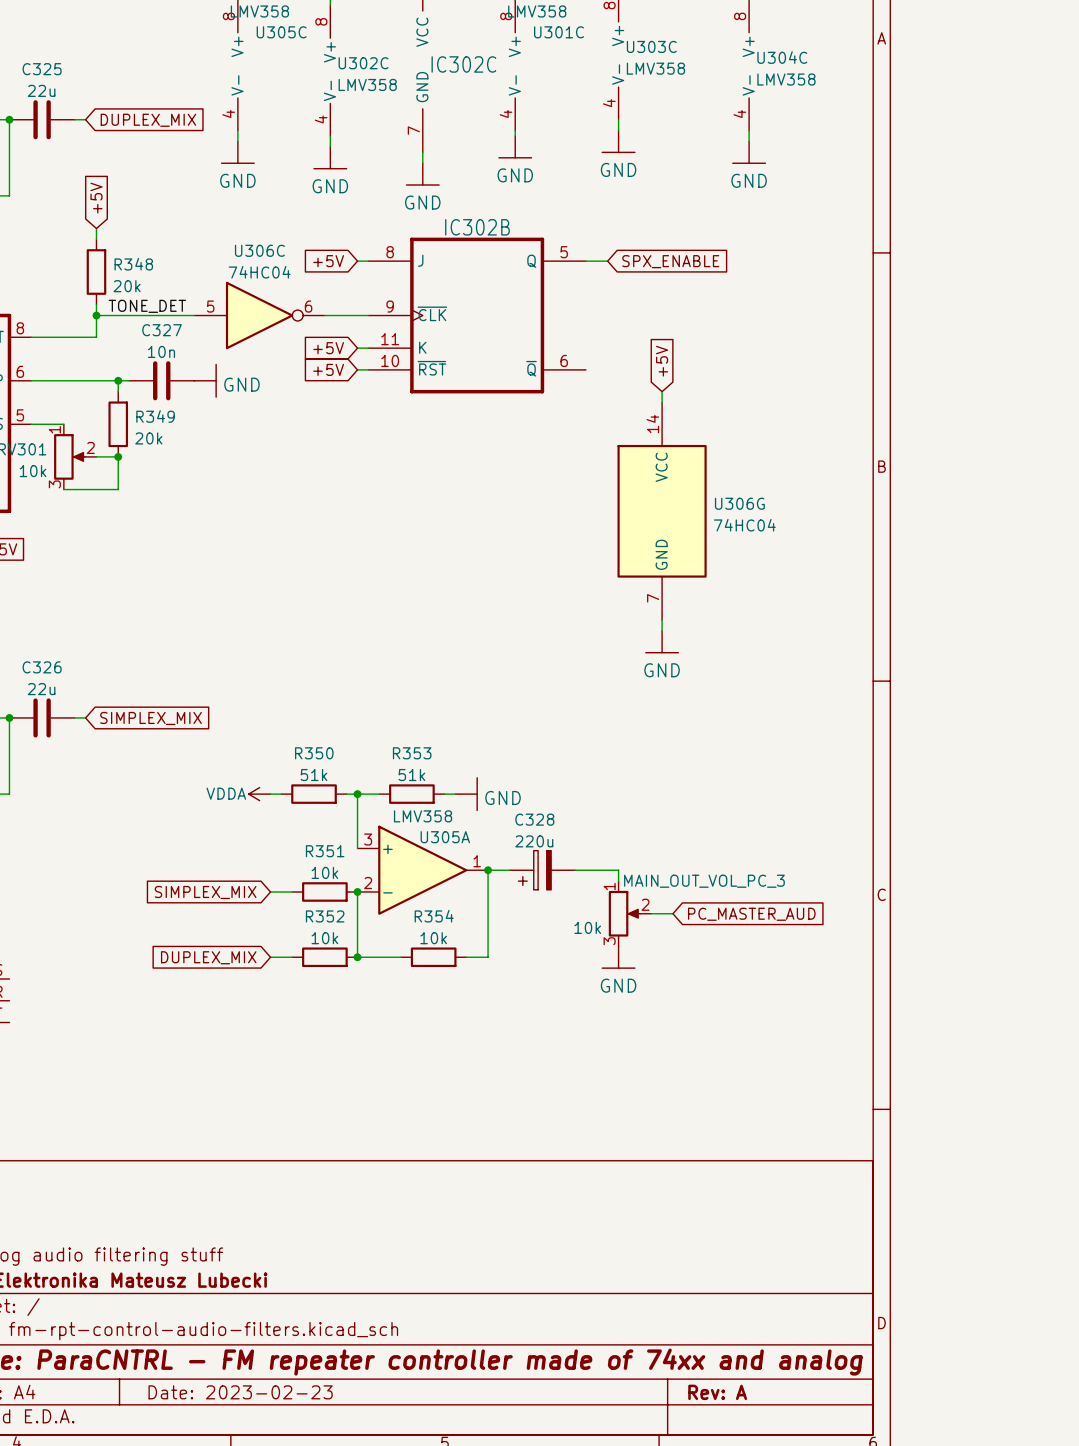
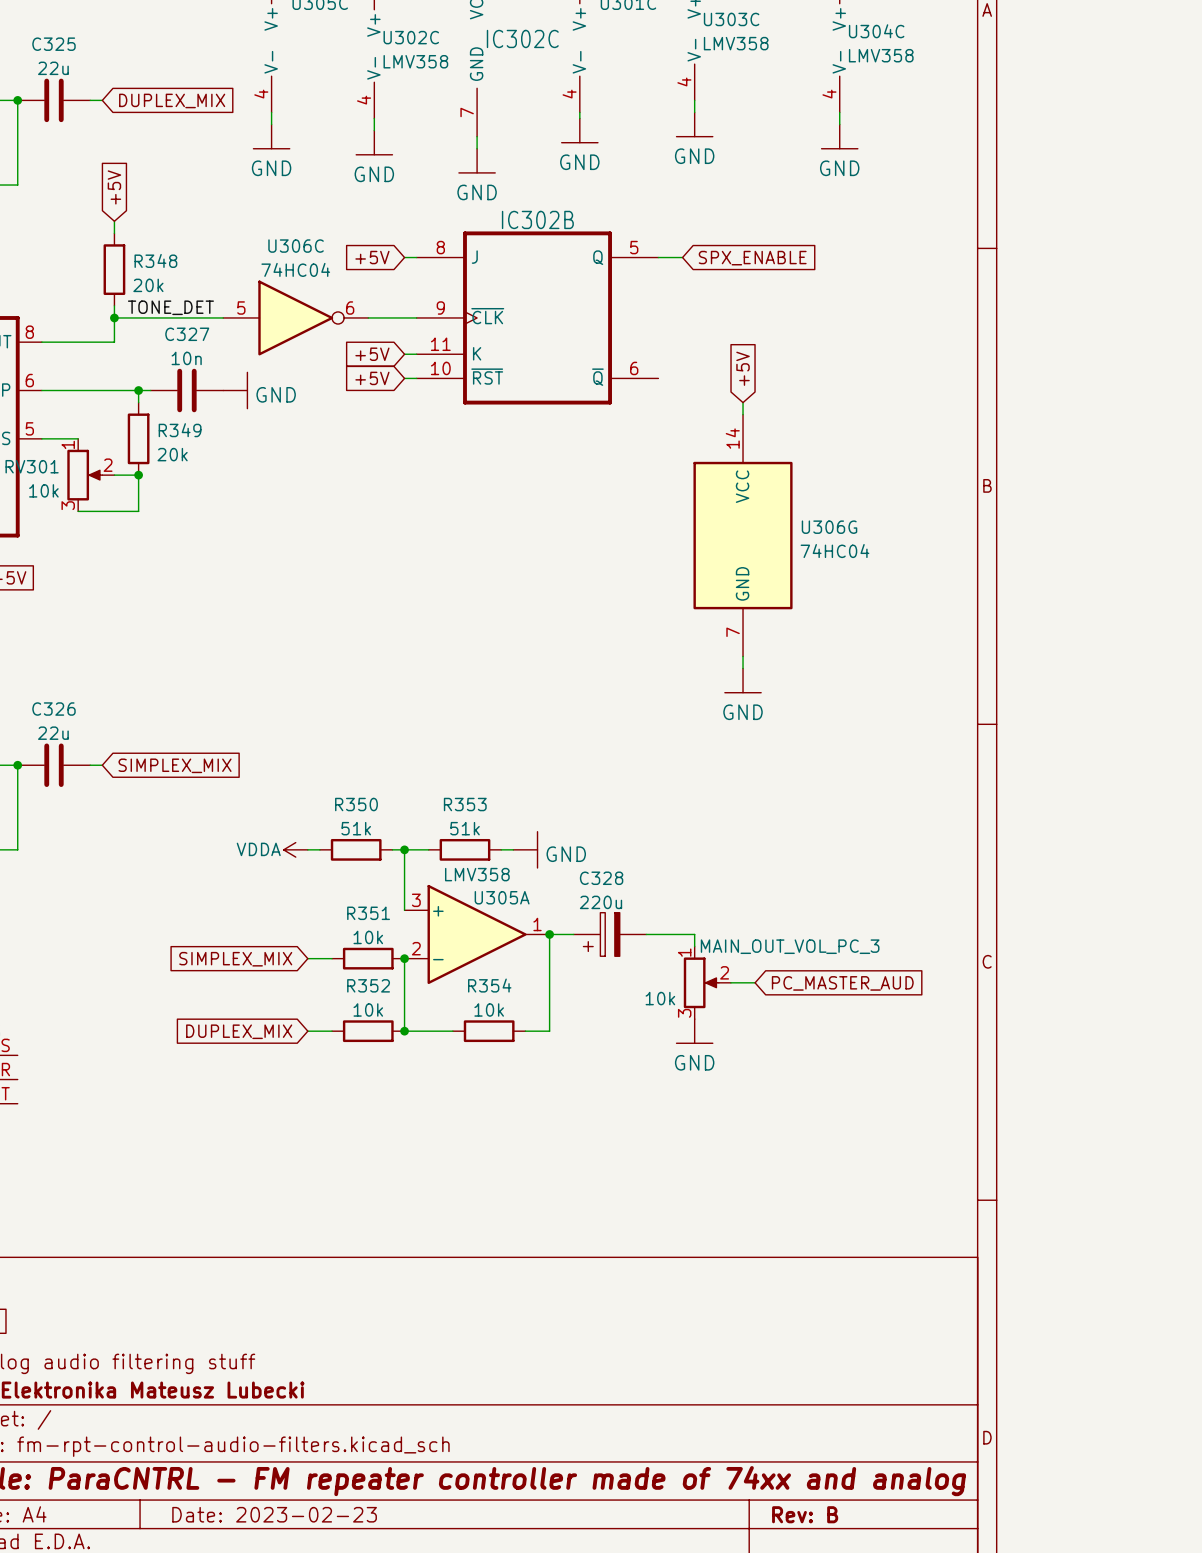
title block: Rev: A (717, 1392) -> Rev: B (805, 1514)

